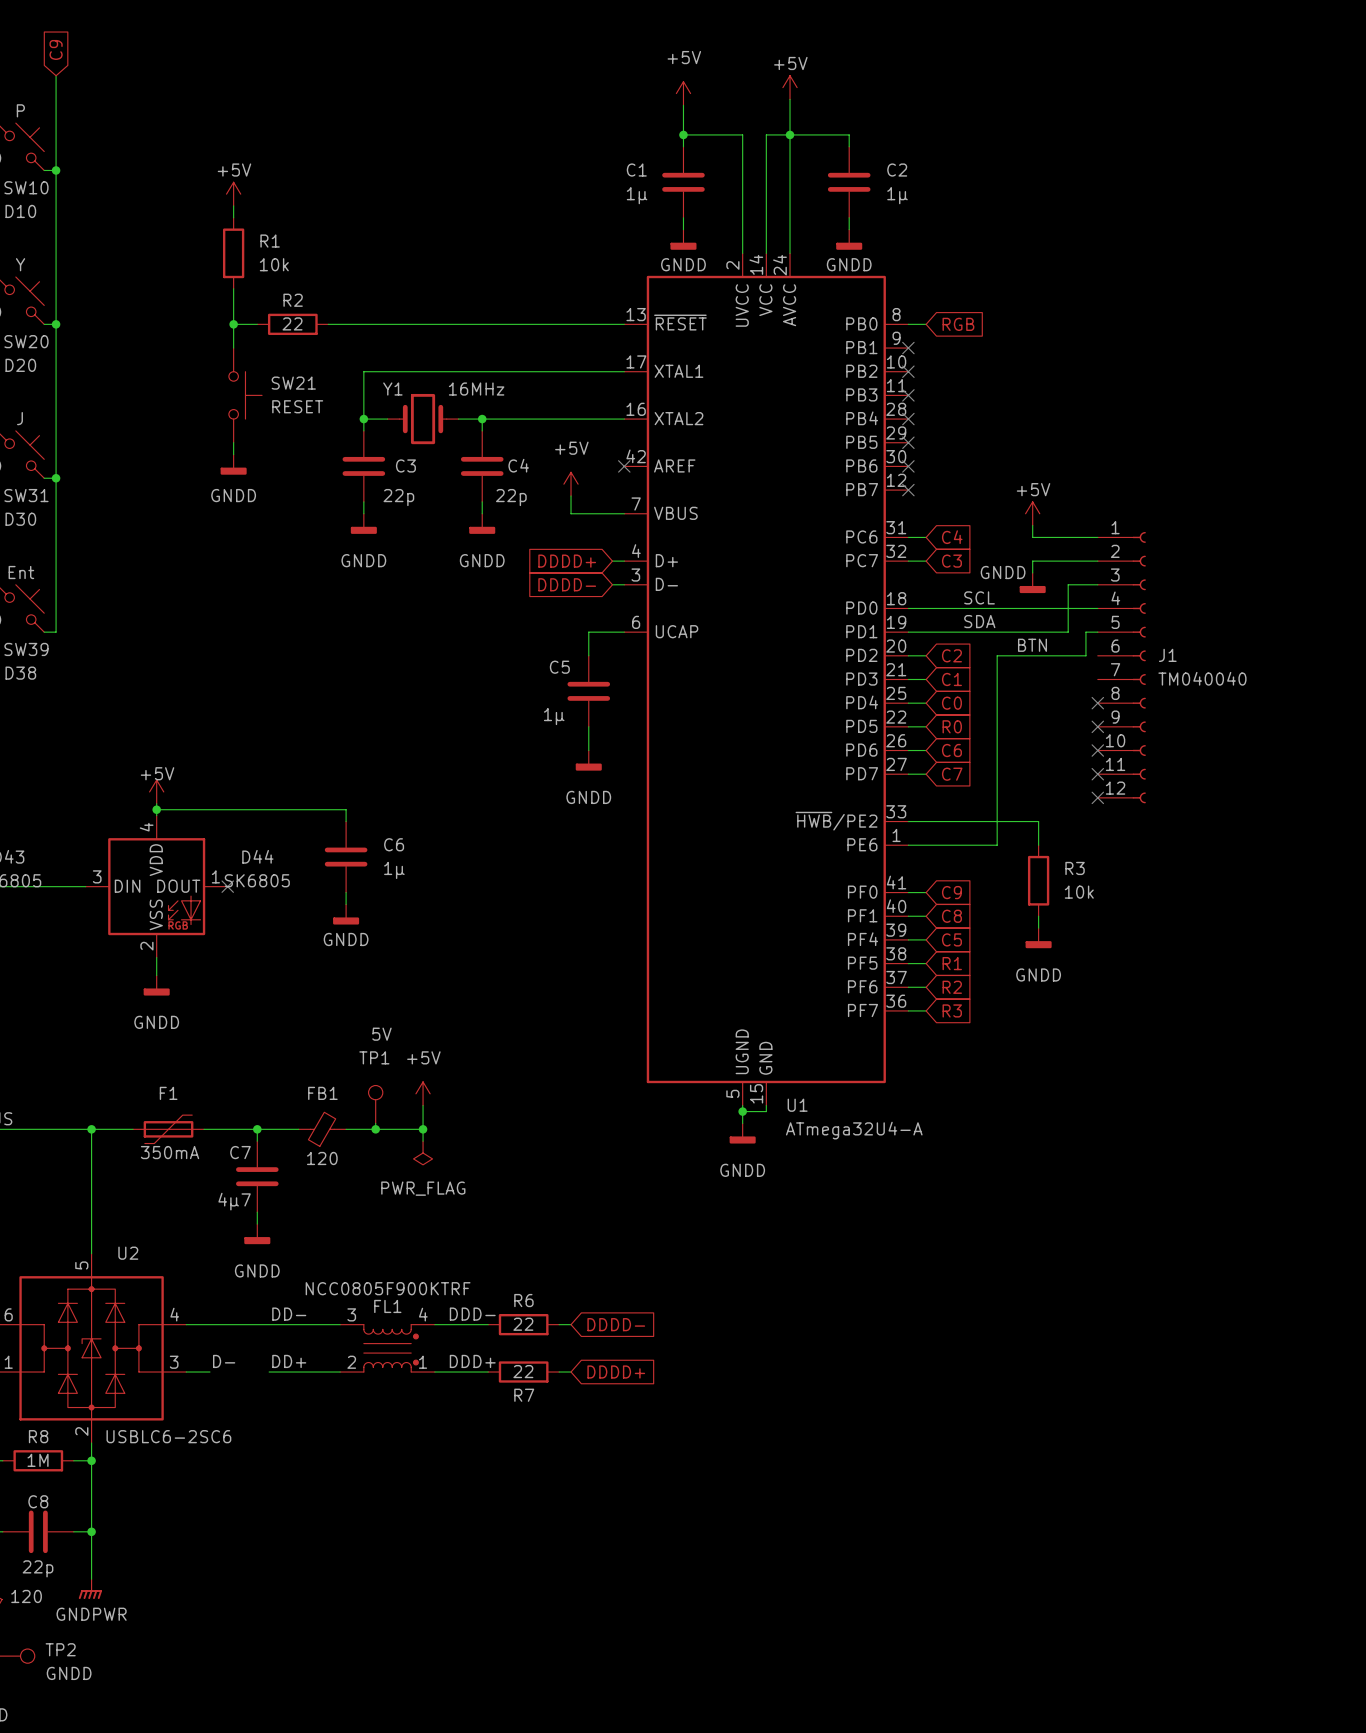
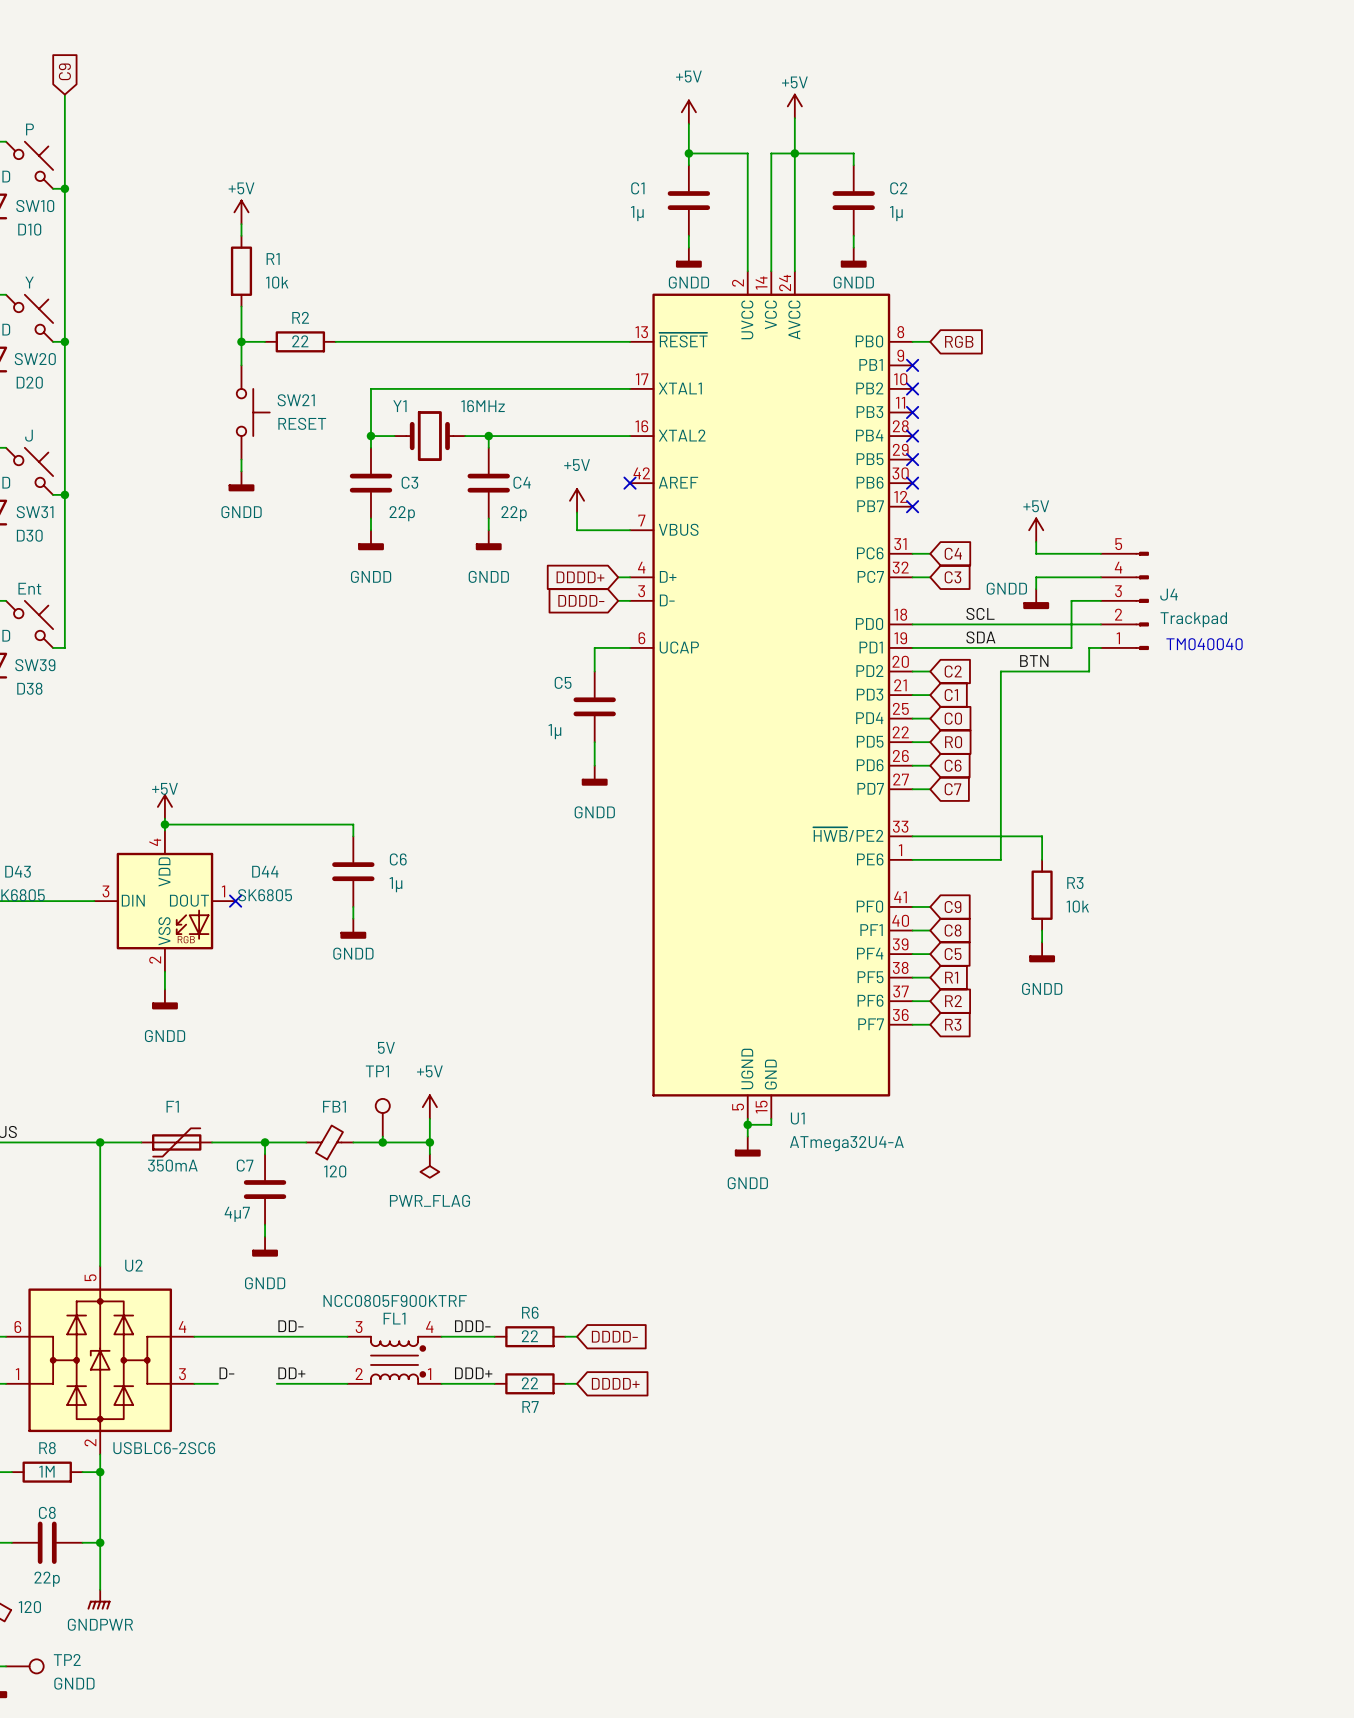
J4: none -> Trackpad (1124, 600)
text: none -> TM040040 (1204, 644)
J1: TM040040 (1121, 667) -> none
no-connect mark: (1097, 703) -> none
no-connect mark: (1097, 726) -> none
no-connect mark: (1097, 750) -> none
no-connect mark: (1097, 774) -> none
no-connect mark: (1097, 797) -> none

